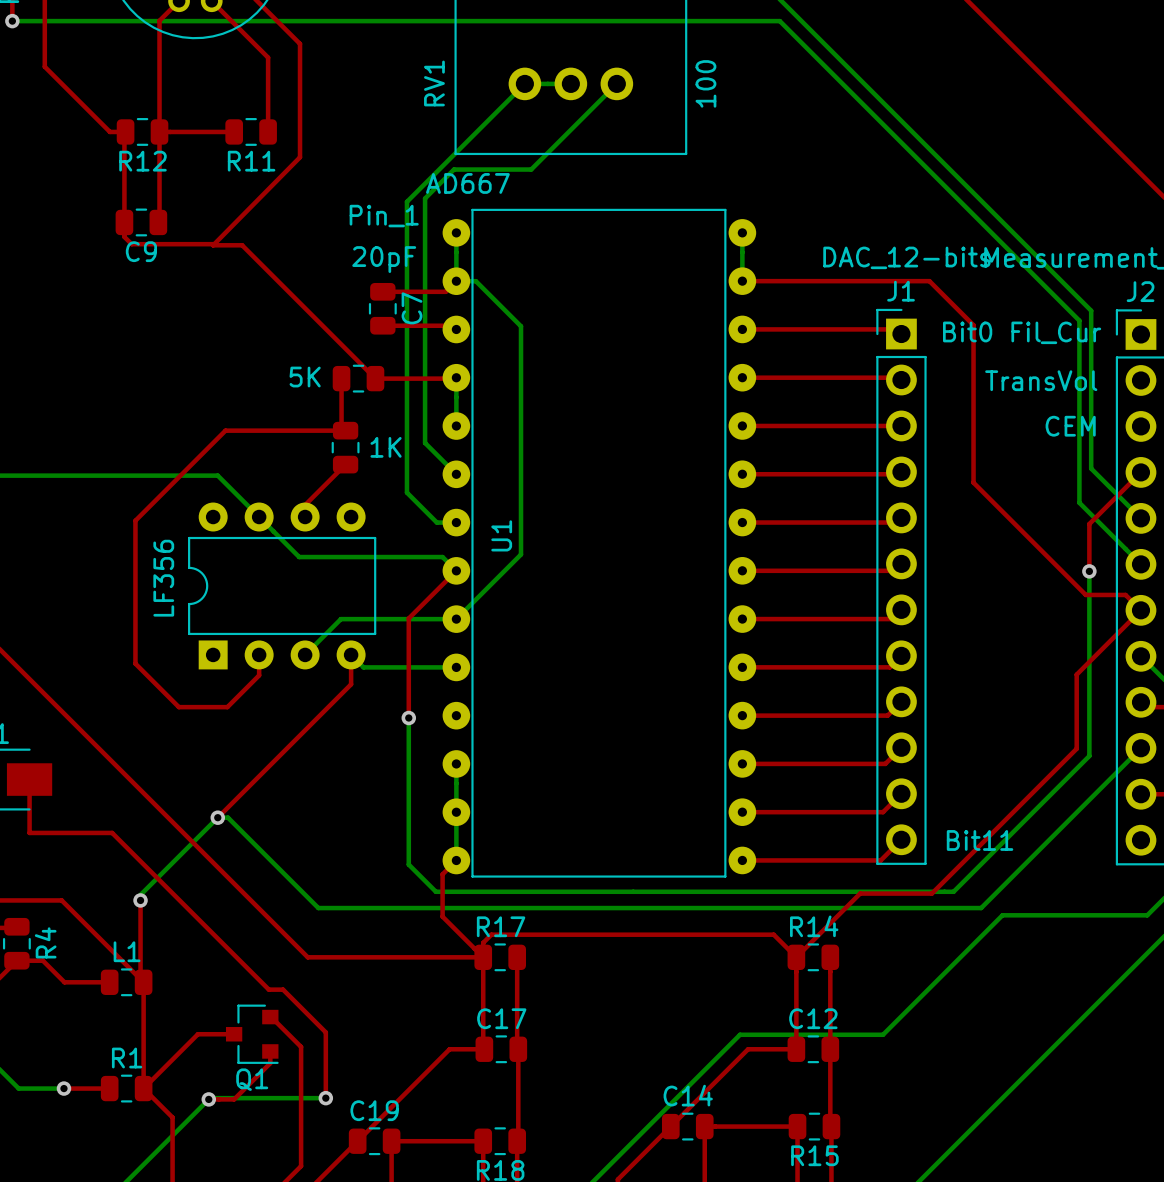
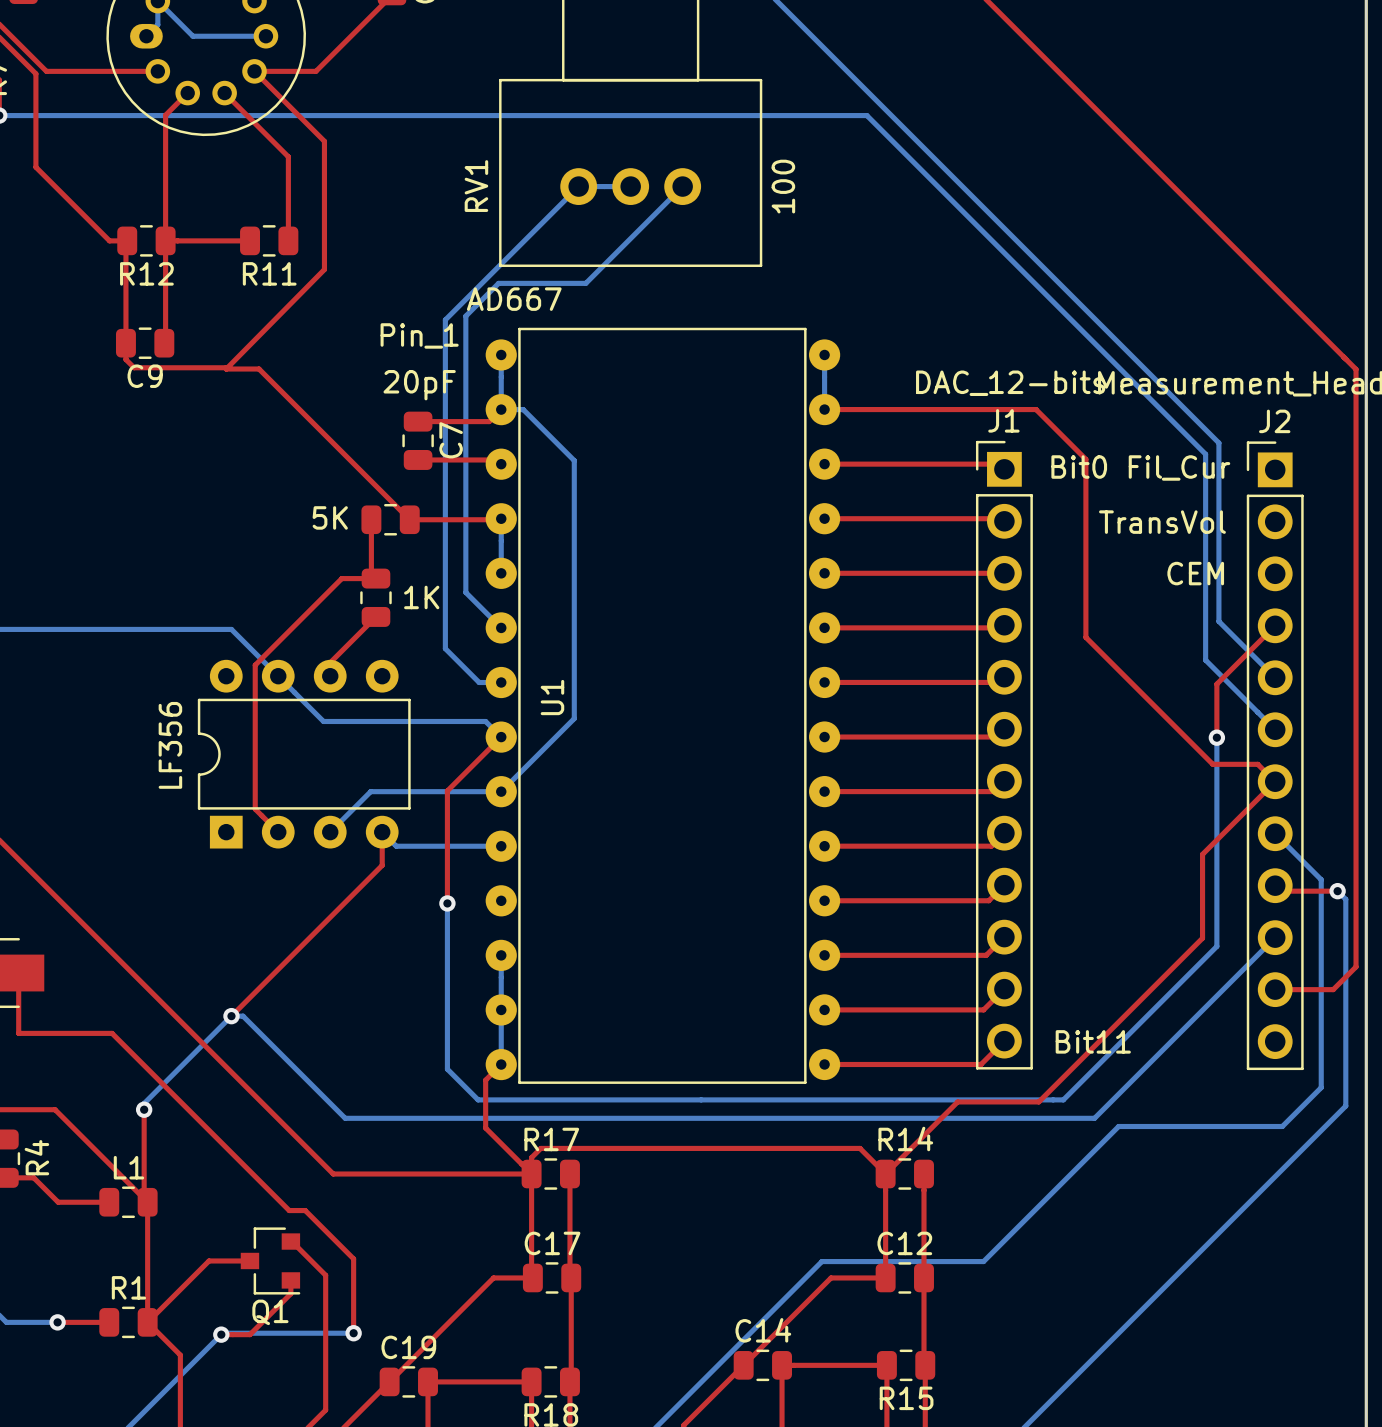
top track: (315, 430) (225, 430) (135, 520) (135, 663) (178, 707) (227, 707) (259, 675) (259, 654) -> (341, 578) (255, 665) (255, 809) (278, 832)

